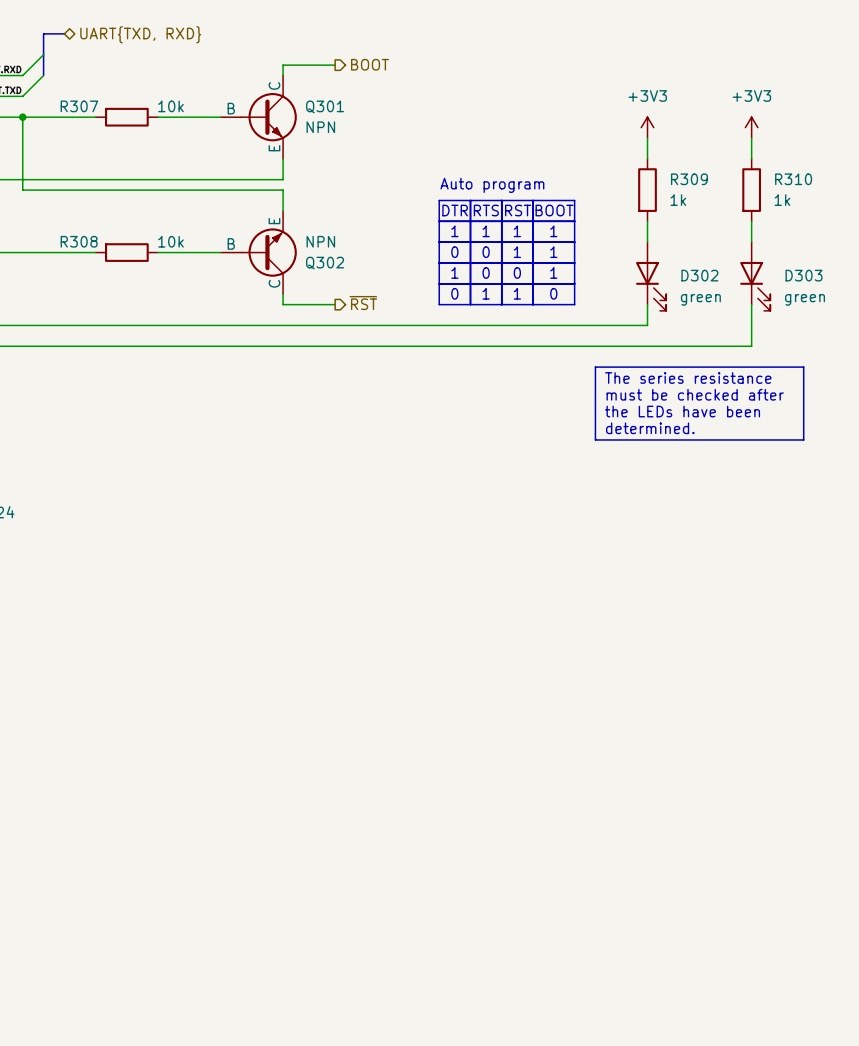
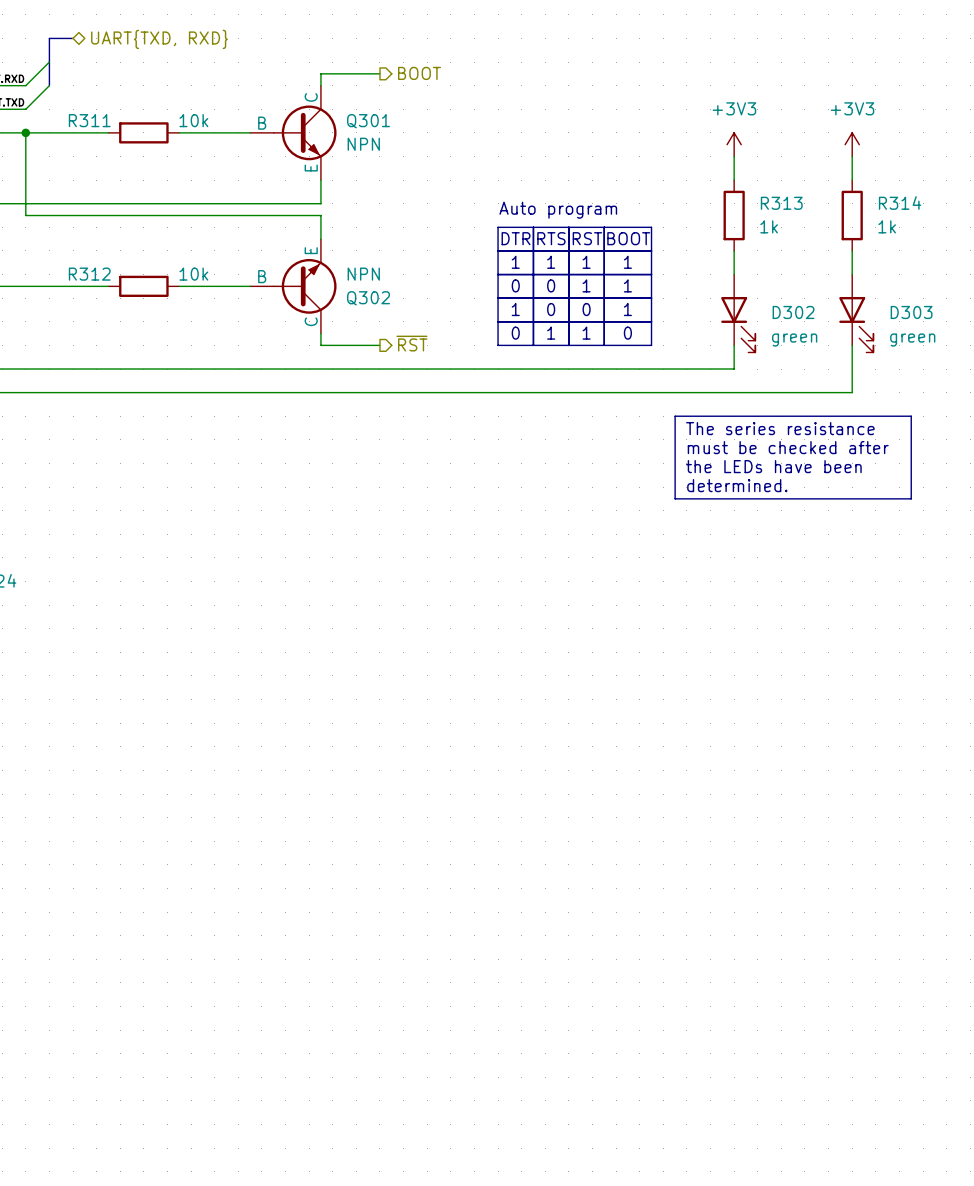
R307 name: R307 (79, 106) -> R311 (89, 120)
R309 name: R309 (689, 179) -> R313 (781, 203)
R310 name: R310 (793, 179) -> R314 (900, 202)
R308 name: R308 (79, 241) -> R312 (89, 274)

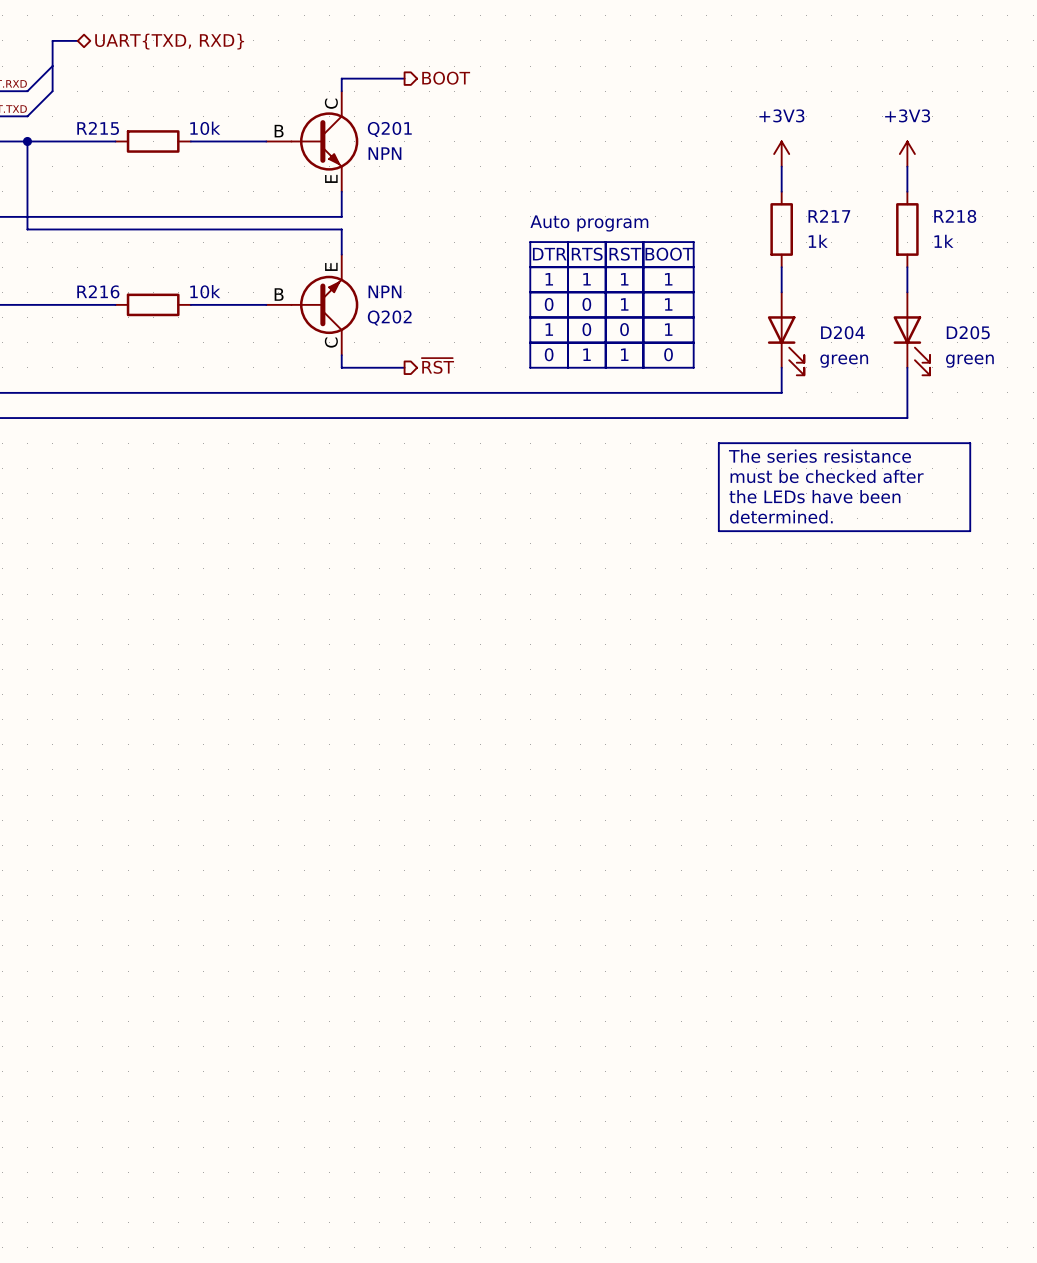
R311 name: R311 (89, 120) -> R215 (98, 128)
Q301 name: Q301 (368, 121) -> Q201 (389, 129)
R314 name: R314 (900, 202) -> R218 (955, 216)
R313 name: R313 (781, 203) -> R217 (829, 216)
R312 name: R312 (89, 274) -> R216 (98, 291)
Q302 name: Q302 (368, 298) -> Q202 (389, 318)
D302 name: D302 (793, 312) -> D204 (842, 332)
D303 name: D303 (911, 312) -> D205 (968, 332)

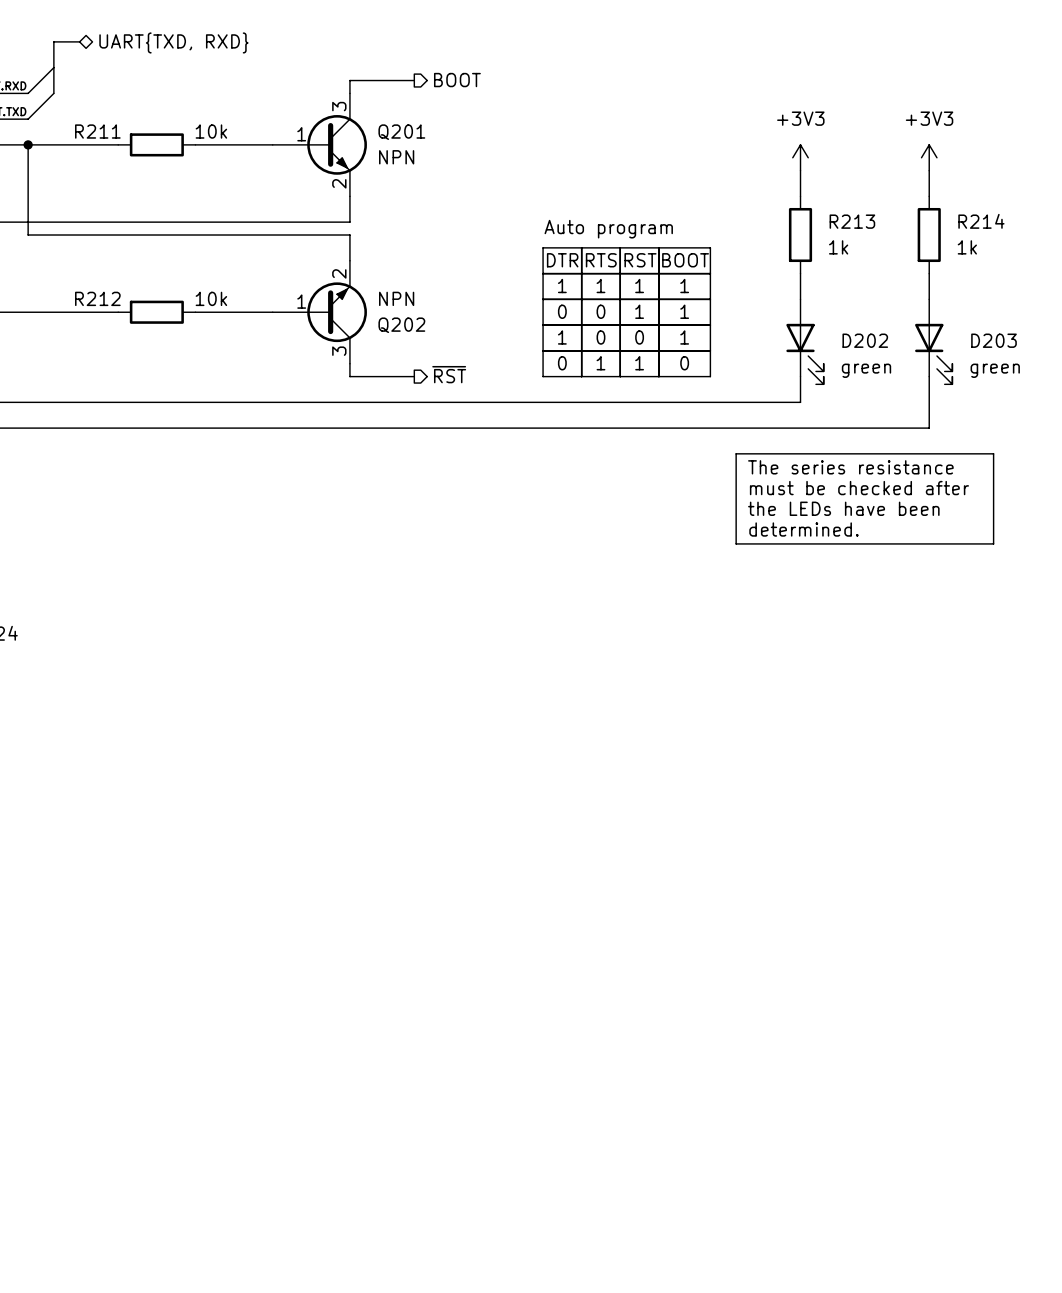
Q201 symbol: [266, 91, 359, 192] -> [272, 93, 367, 197]
R215 name: R215 (98, 128) -> R211 (97, 131)
R217 name: R217 (829, 216) -> R213 (852, 221)
R218 name: R218 (955, 216) -> R214 (981, 221)
Q202 symbol: [266, 254, 359, 356] -> [272, 260, 367, 364]
R216 name: R216 (98, 291) -> R212 (97, 298)
D204 name: D204 (842, 332) -> D202 (865, 340)
D205 name: D205 (968, 332) -> D203 (994, 340)

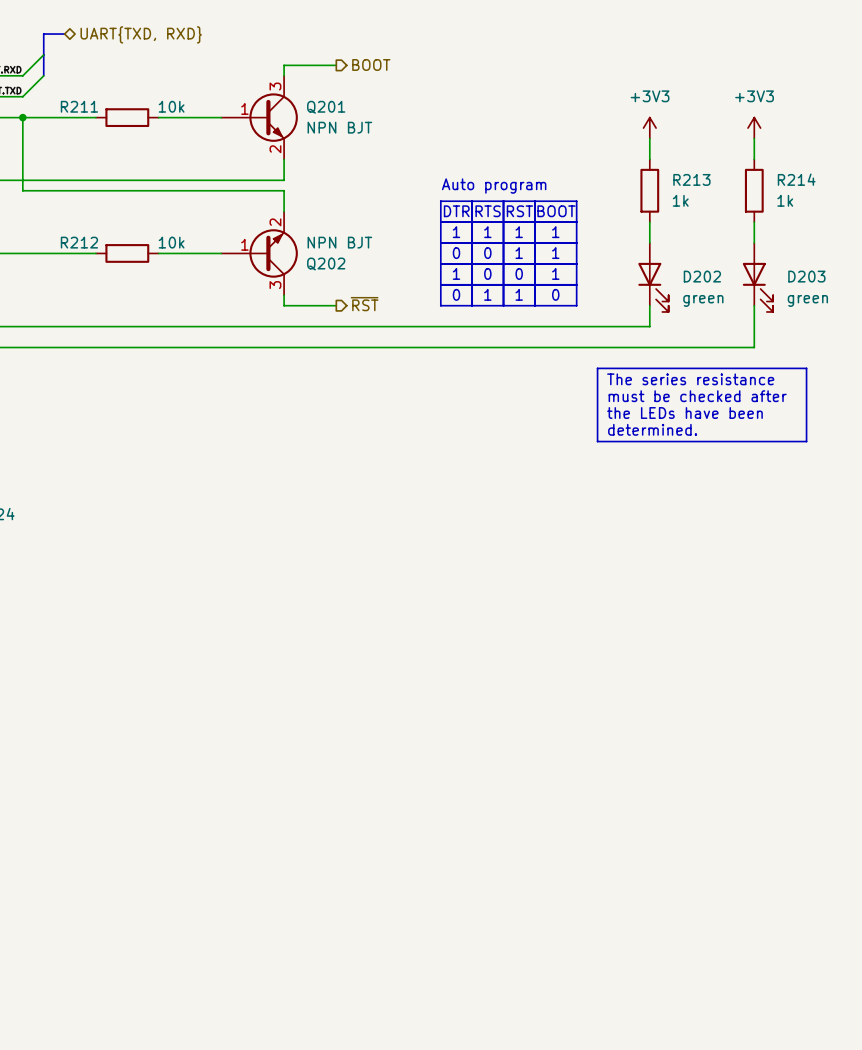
Q201 value: NPN (396, 157) -> NPN BJT (339, 127)
Q202 value: NPN (396, 298) -> NPN BJT (339, 242)

